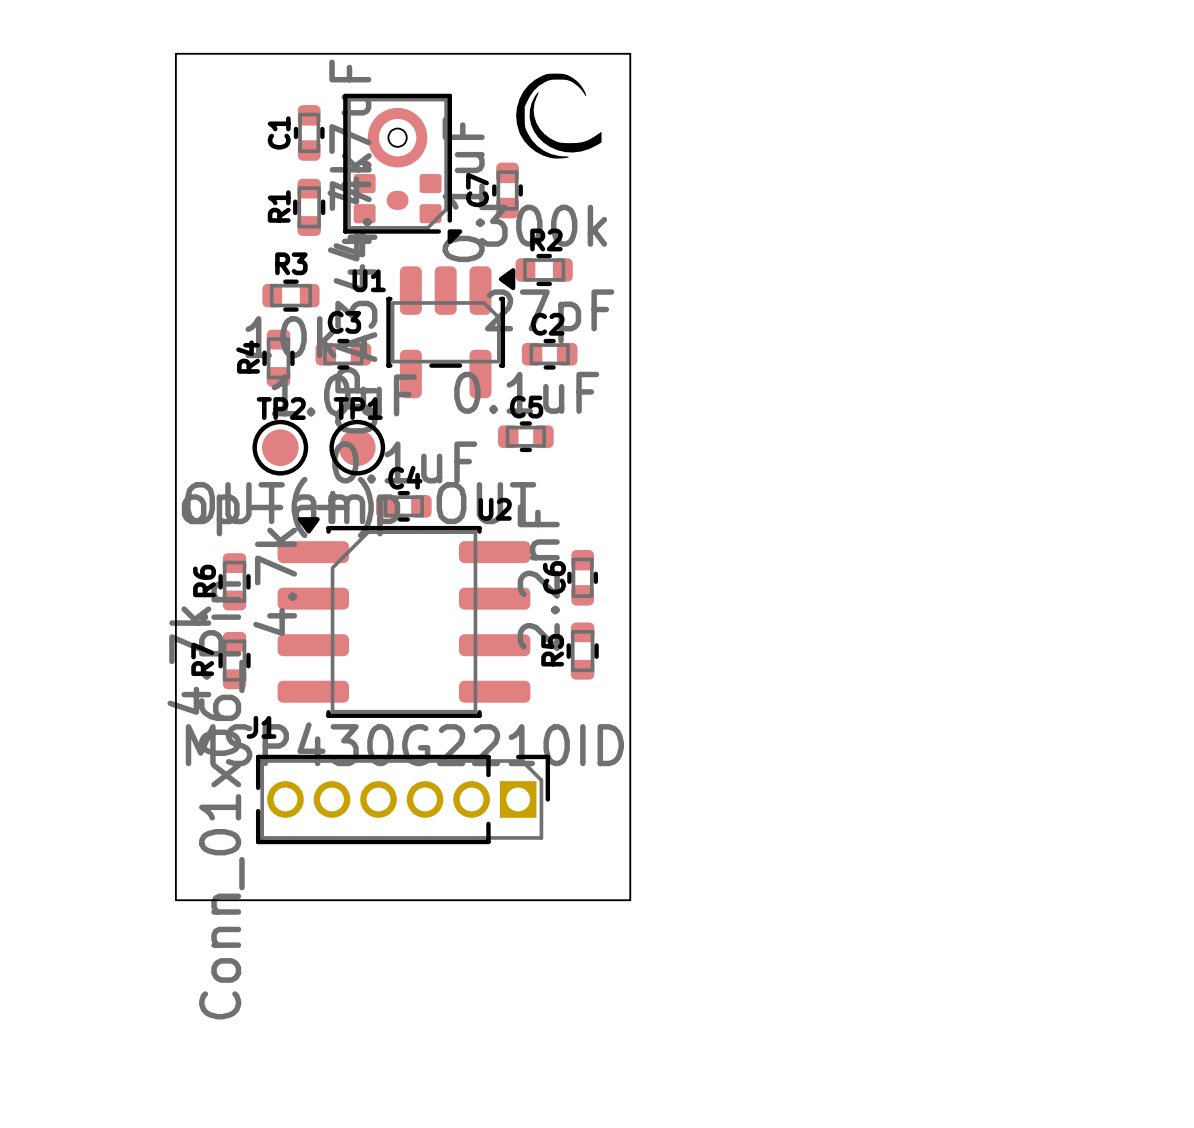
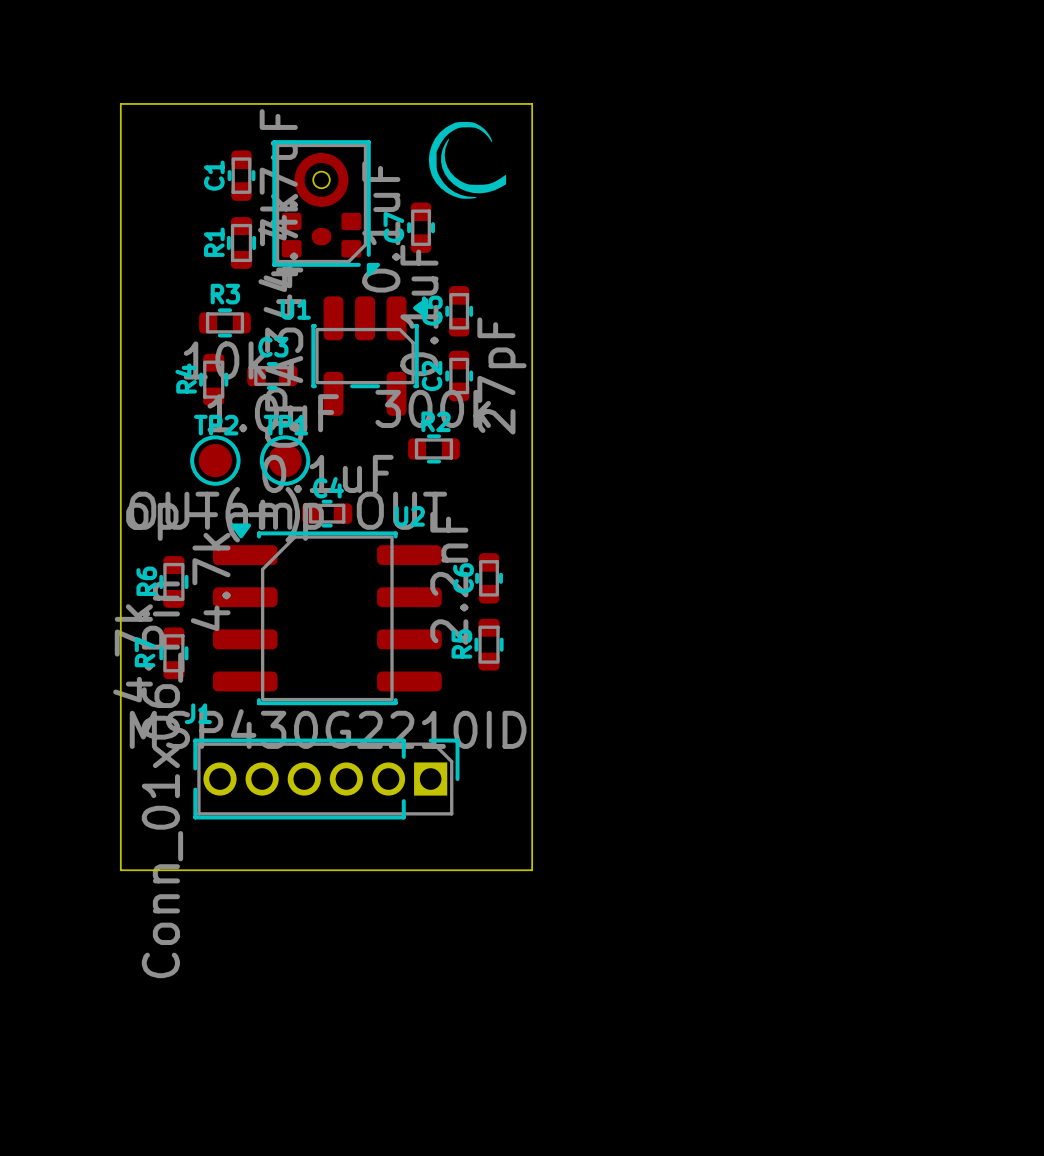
R2 position: (544, 269) -> (433, 448)
C2 rotation: 0° (549, 354) -> 90° clockwise (459, 375)
C5 rotation: 0° (525, 436) -> 90° clockwise (459, 311)
C5 position: (525, 436) -> (459, 311)

